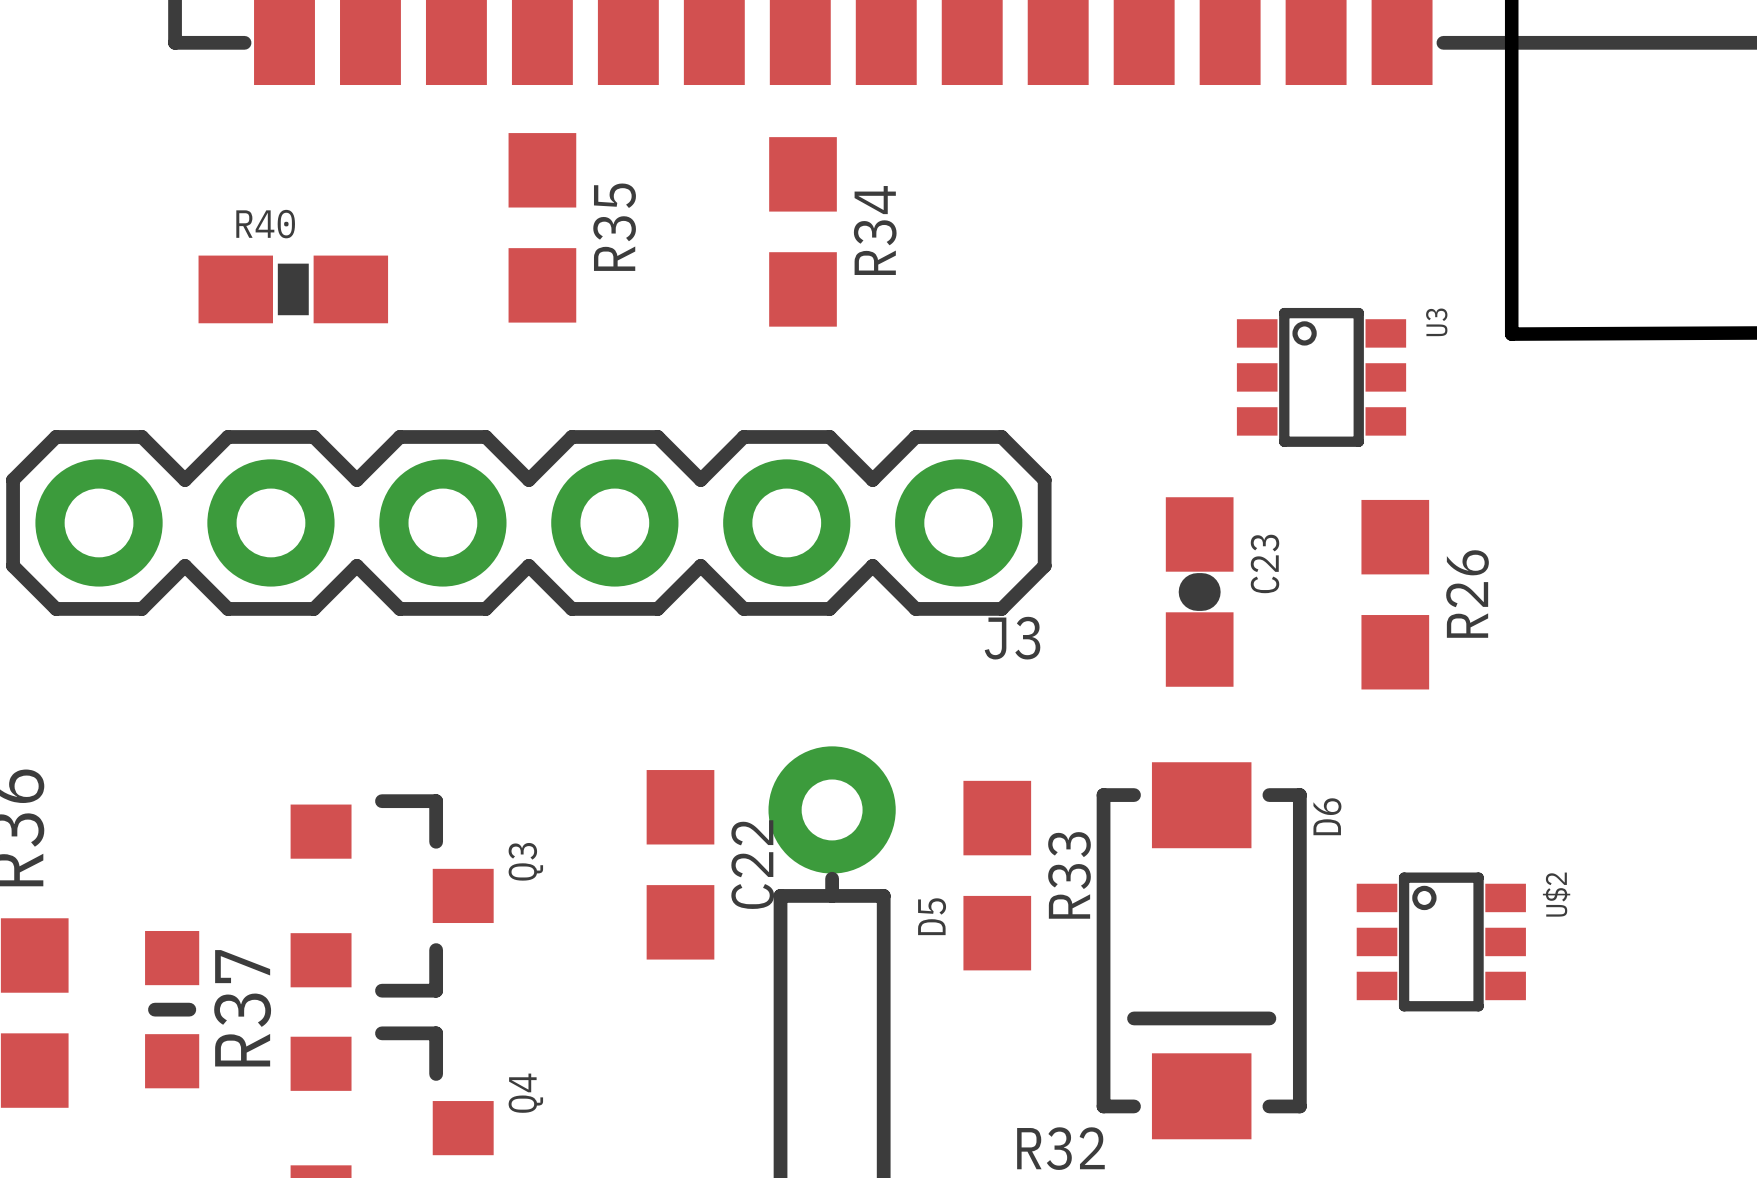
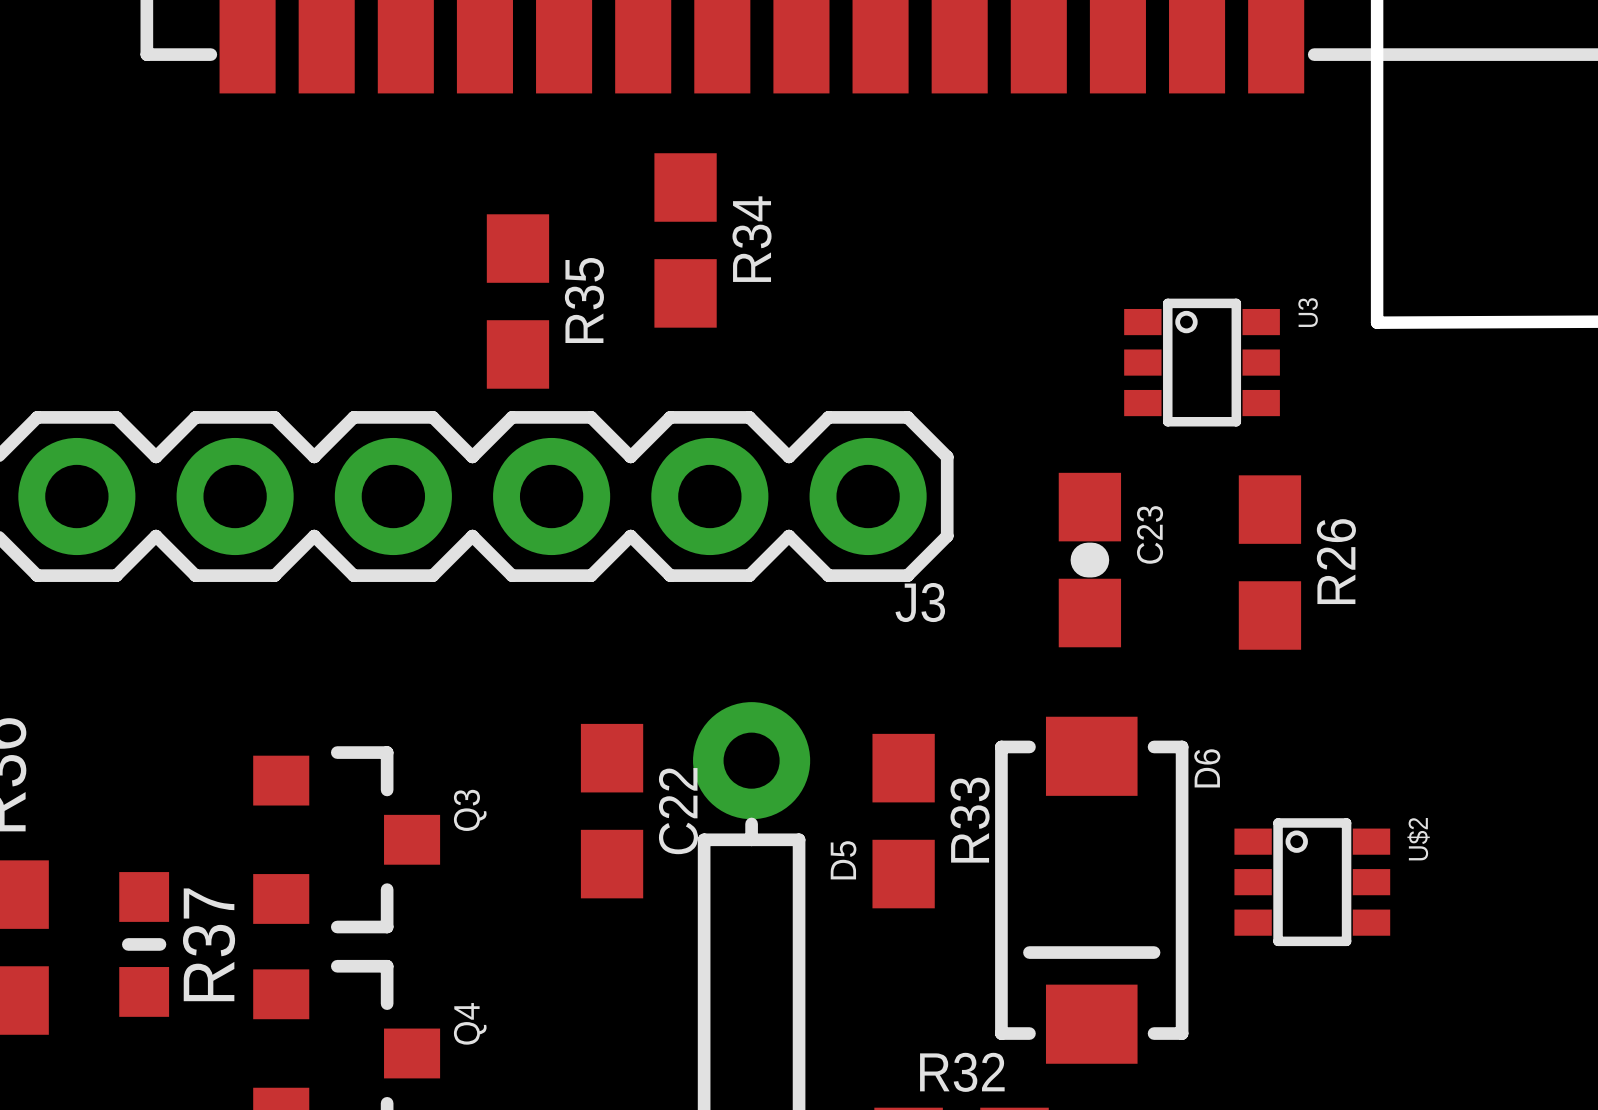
R35 position: (542, 227) -> (517, 301)
R34 position: (803, 231) -> (685, 240)
R40: (293, 289) -> none

